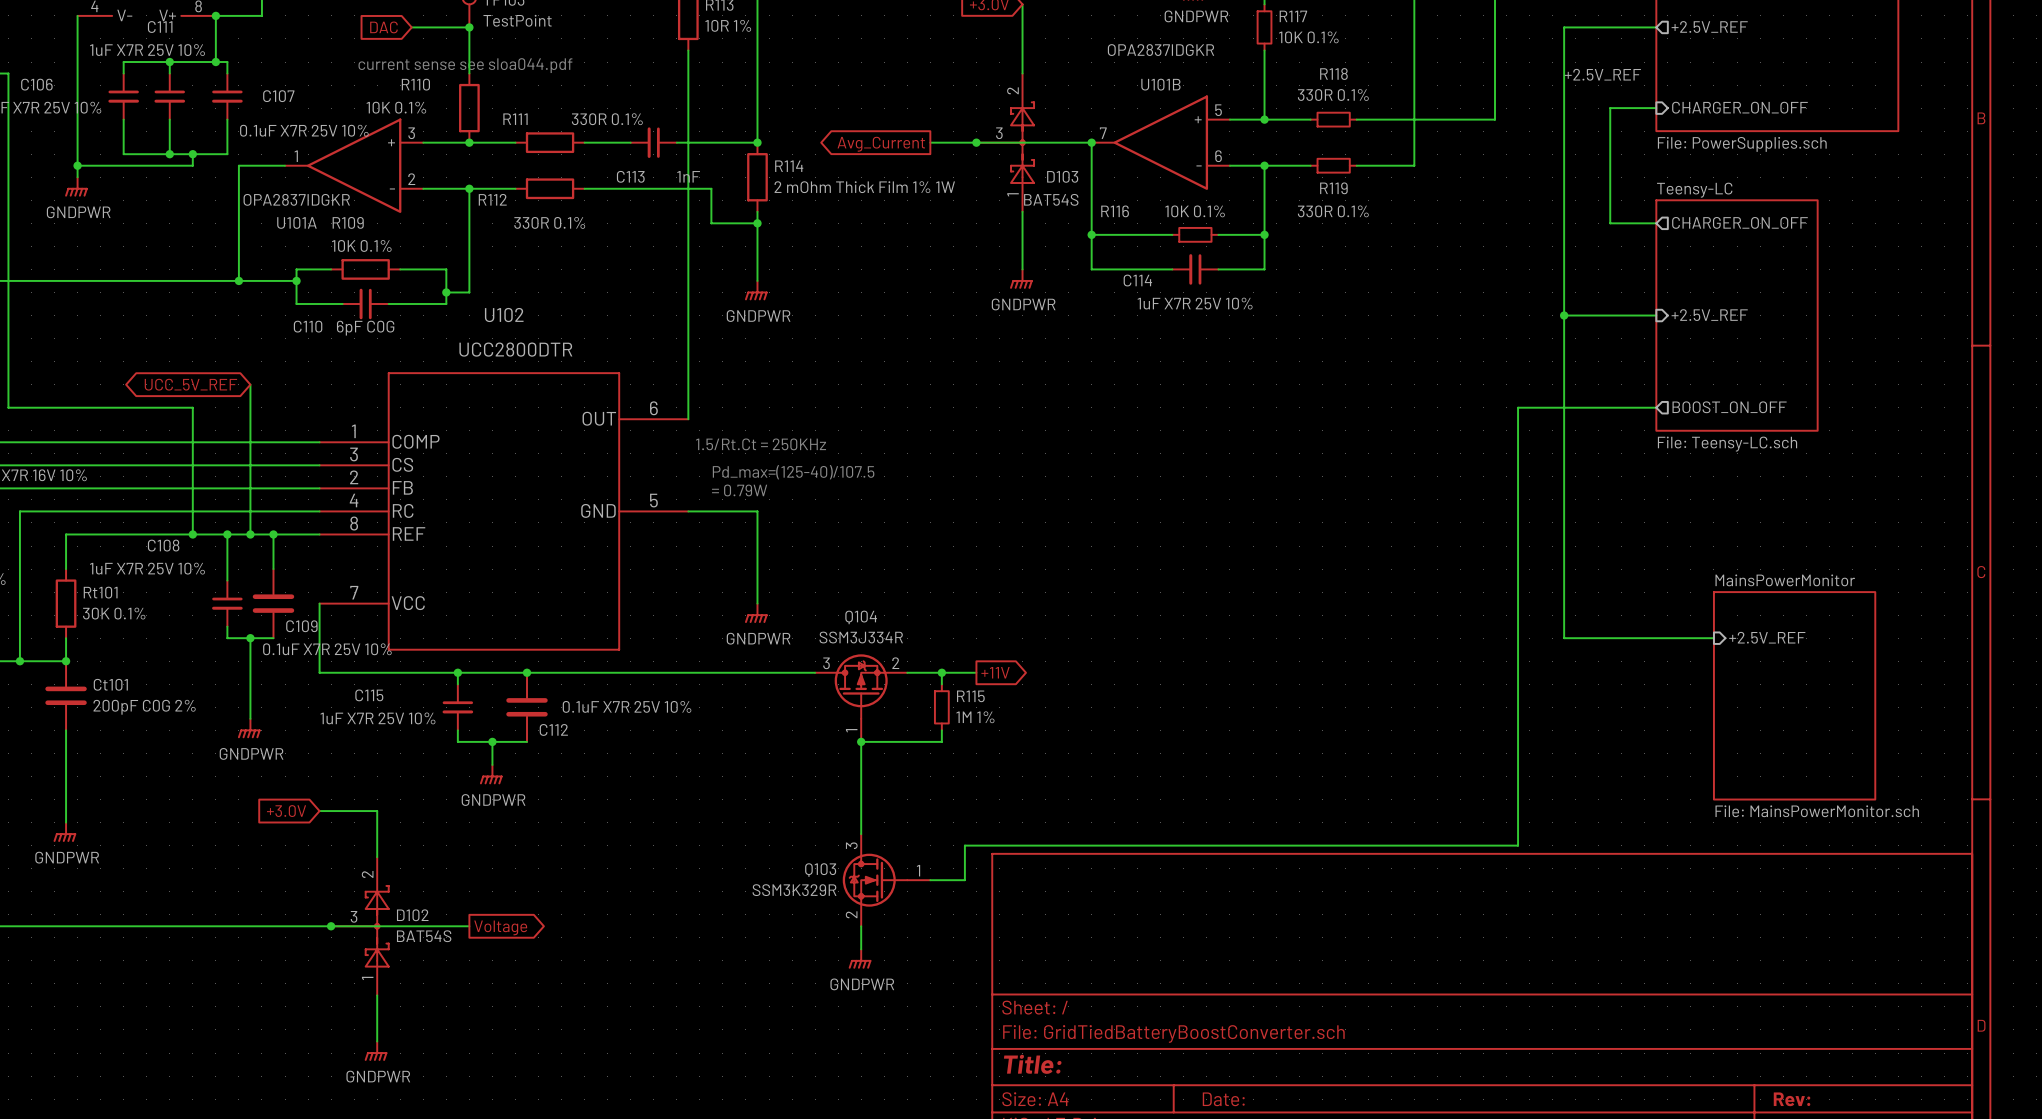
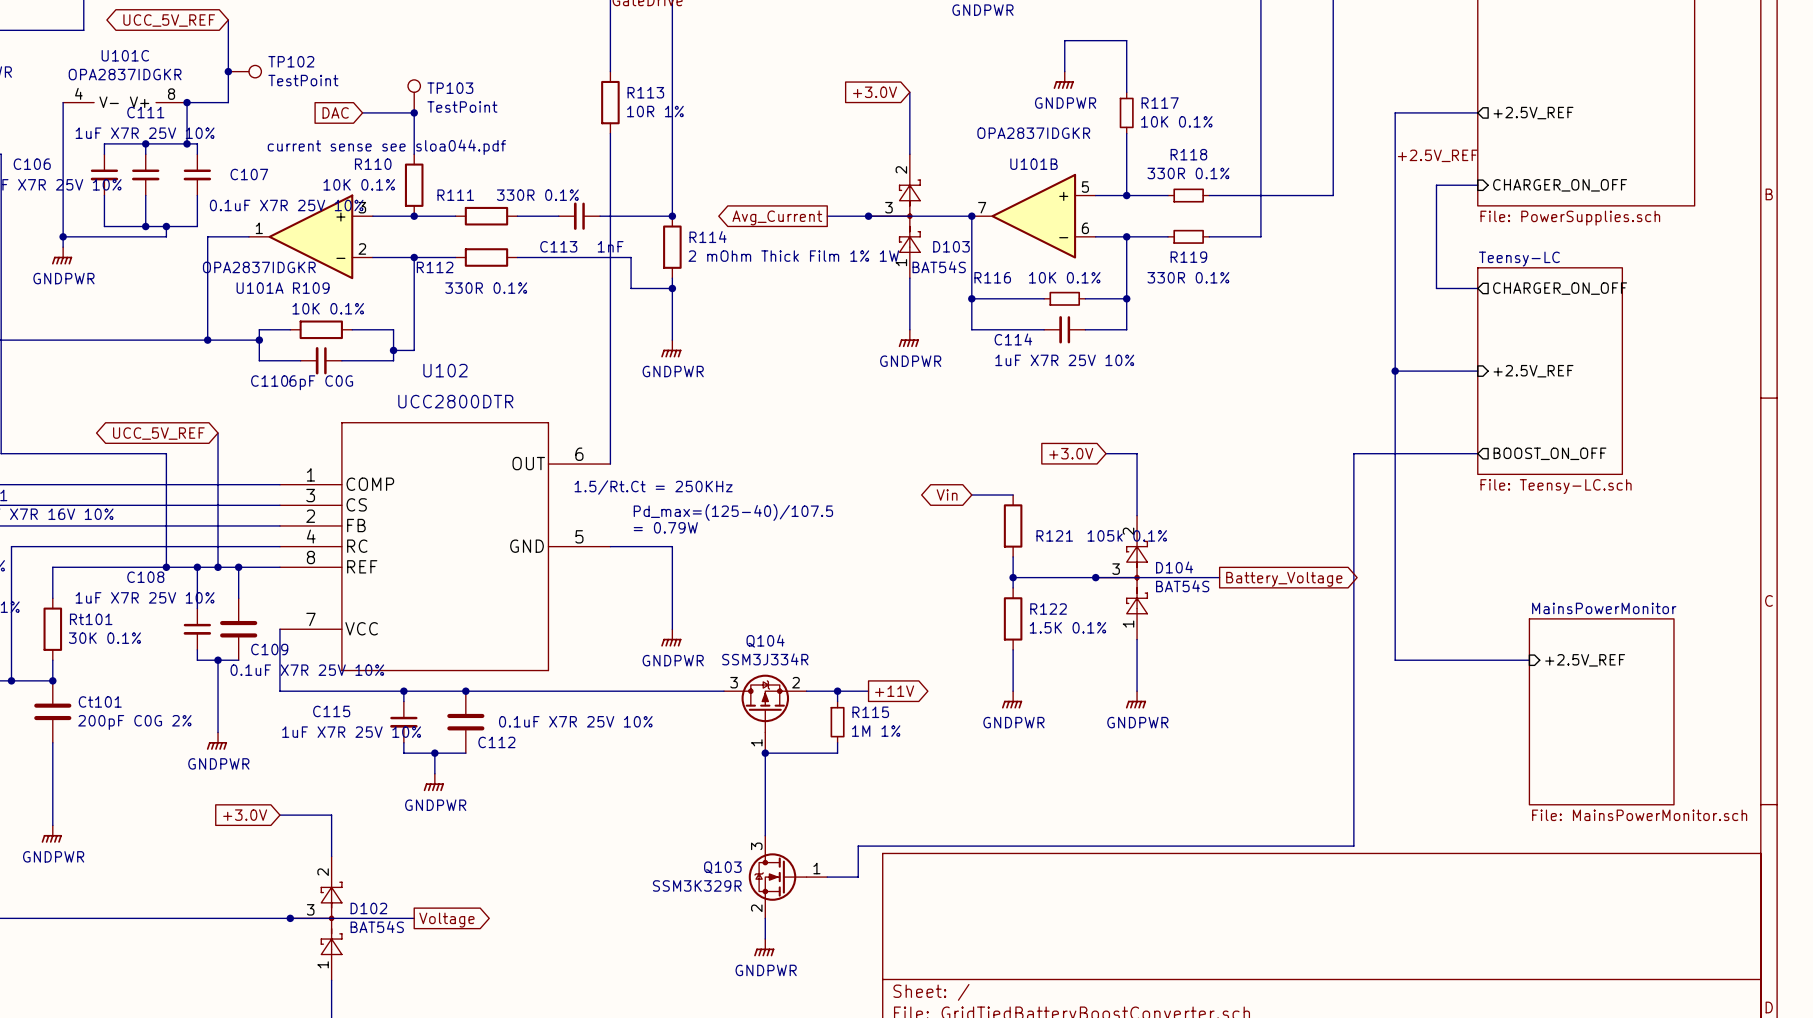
global label: none -> +3.0V (1071, 453)
wire: none -> (1106, 453) (1137, 453) (1137, 515)
global label: none -> Vin (947, 495)
wire: none -> (971, 495) (1013, 495)
R121: none -> 105k 0.1% (1013, 525)
wire: none -> (1013, 556) (1013, 587)
wire: none -> (1013, 577) (1219, 577)
junction: none -> (1013, 577)
junction: none -> (1095, 577)
D104: none -> BAT54S (1121, 577)
global label: none -> Battery_Voltage (1284, 579)
R122: none -> 1.5K 0.1% (1013, 618)
wire: none -> (1137, 639) (1137, 691)
wire: none -> (1013, 649) (1013, 691)
power symbol: none -> GNDPWR (1012, 699)
power symbol: none -> GNDPWR (1136, 699)

